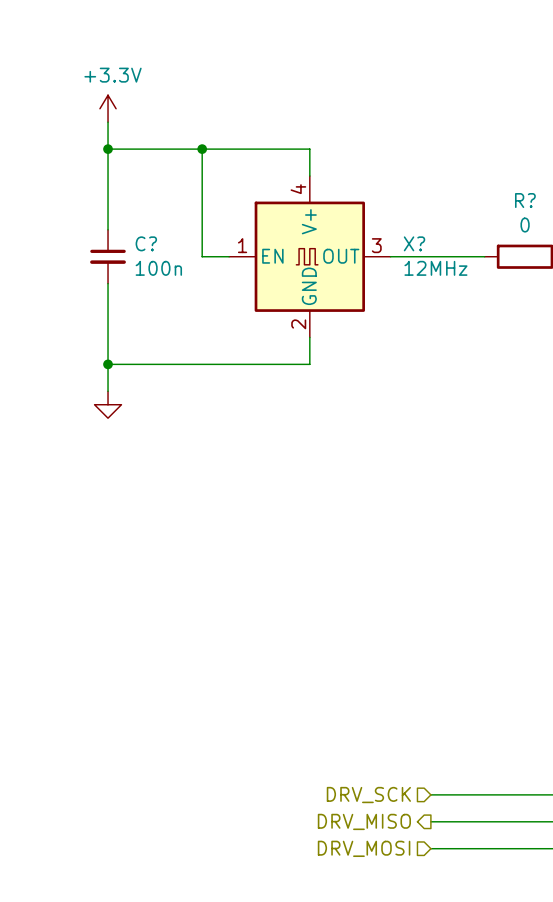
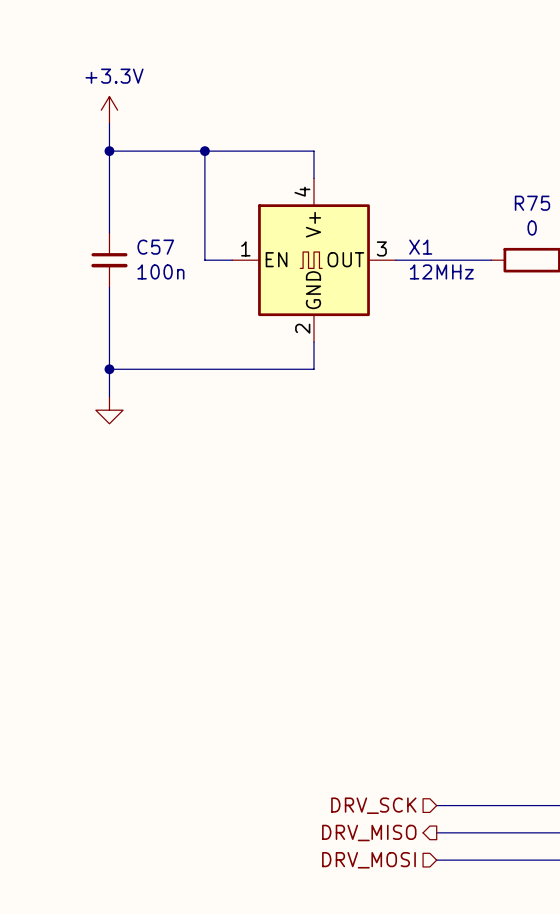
R? name: R? (525, 200) -> R75 (532, 203)
C? name: C? (146, 243) -> C57 (155, 247)
X? name: X? (414, 243) -> X1 (420, 247)

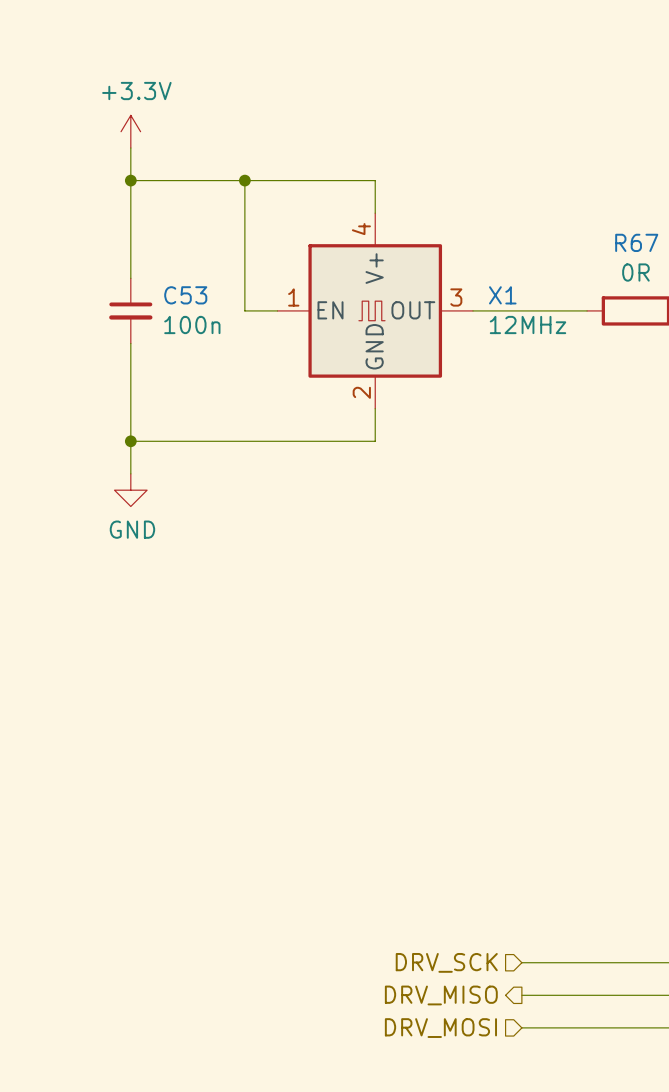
R75 name: R75 (532, 203) -> R67 (636, 242)
R75 value: 0 (532, 228) -> 0R (635, 272)
C57 name: C57 (155, 247) -> C53 (185, 295)
power symbol text: none -> GND (132, 529)

